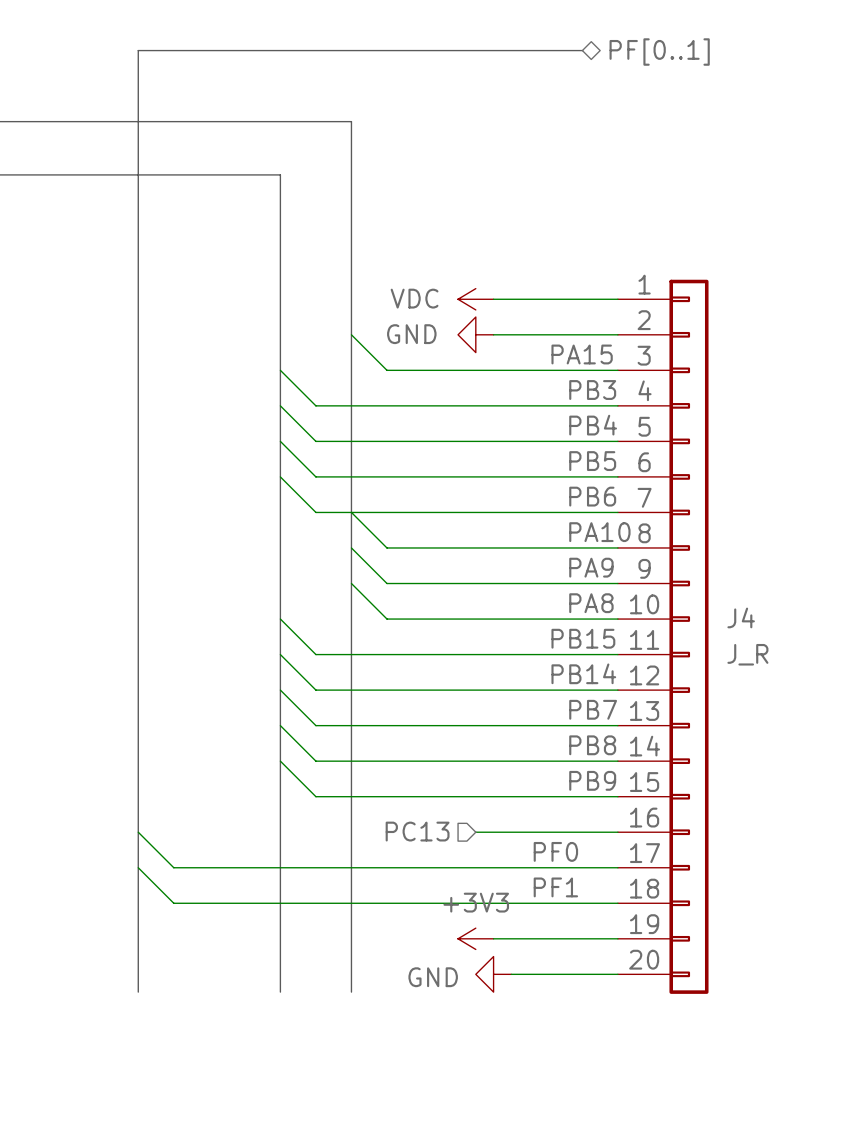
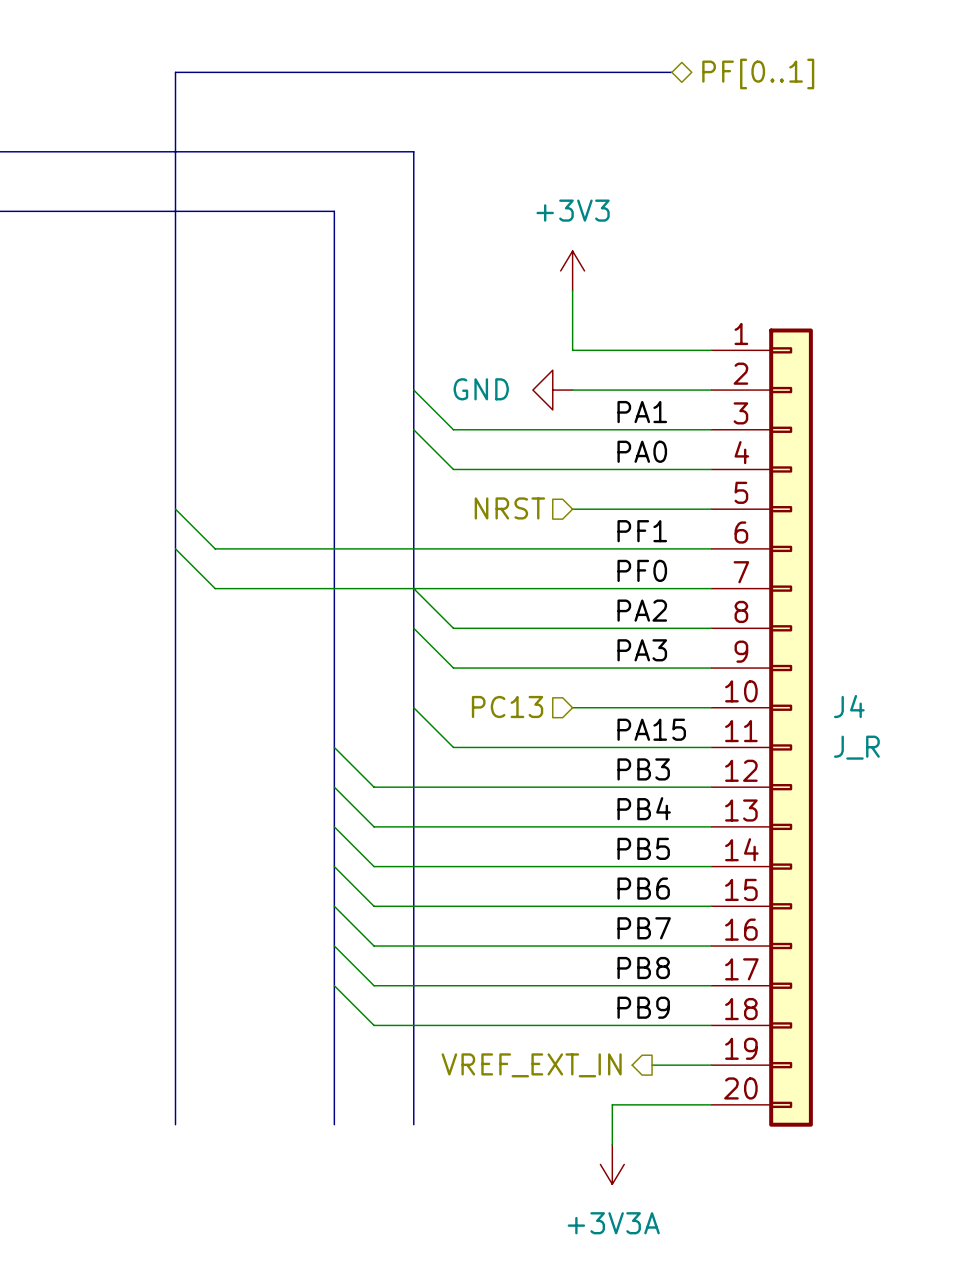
power symbol: none -> +3V3 (572, 270)
wire: none -> (572, 290) (572, 350)
power symbol: VDC (475, 299) -> none
label: none -> PA1 (642, 412)
label position: PA15 (582, 354) -> PA15 (651, 729)
wire: (280, 370) (315, 405) (386, 405) -> (413, 429) (453, 469)
label: none -> PA0 (642, 451)
label position: PB3 (592, 390) -> PB3 (643, 769)
wire: (280, 405) (315, 441) (493, 441) -> none
label position: PB4 (593, 425) -> PB4 (644, 808)
hierarchical label: none -> NRST (509, 508)
wire: (280, 441) (315, 476) -> (175, 509) (215, 548) (374, 548)
label: none -> PF1 (642, 531)
label position: PB5 (592, 461) -> PB5 (643, 848)
wire: (280, 476) (315, 512) -> (175, 548) (215, 588) (374, 588)
label: none -> PF0 (642, 570)
label position: PB6 (592, 496) -> PB6 (643, 888)
label: none -> PA2 (642, 610)
label: PA10 (599, 532) -> none
label: none -> PA3 (642, 650)
label: PA9 (591, 567) -> none
wire: (351, 583) (386, 619) (493, 619) -> none
label: PA8 (591, 603) -> none
wire: (280, 619) (315, 654) (386, 654) -> (413, 707) (453, 747)
label: PB15 (583, 638) -> none
label: PB14 (583, 673) -> none
label position: PB7 (593, 709) -> PB7 (644, 928)
label: PB8 (592, 745) -> none
label: PB9 (592, 780) -> none
wire: none -> (334, 906) (374, 946) (552, 946)
hierarchical label position: PC13 (417, 831) -> PC13 (507, 707)
wire: (138, 832) (173, 867) (315, 867) -> (334, 946) (374, 985)
label: PF0 (555, 851) -> PB8 (643, 968)
wire: (138, 867) (173, 903) (315, 903) -> (334, 985) (374, 1025)
label: PF1 (555, 887) -> PB9 (643, 1007)
hierarchical label: none -> VREF_EXT_IN (531, 1065)
power symbol: +3V3 (475, 938) -> none
wire: (493, 938) (564, 938) -> none
power symbol: GND (493, 974) -> none
wire: (511, 974) (529, 974) -> (612, 1144) (612, 1104)
power symbol: none -> +3V3A (612, 1164)

